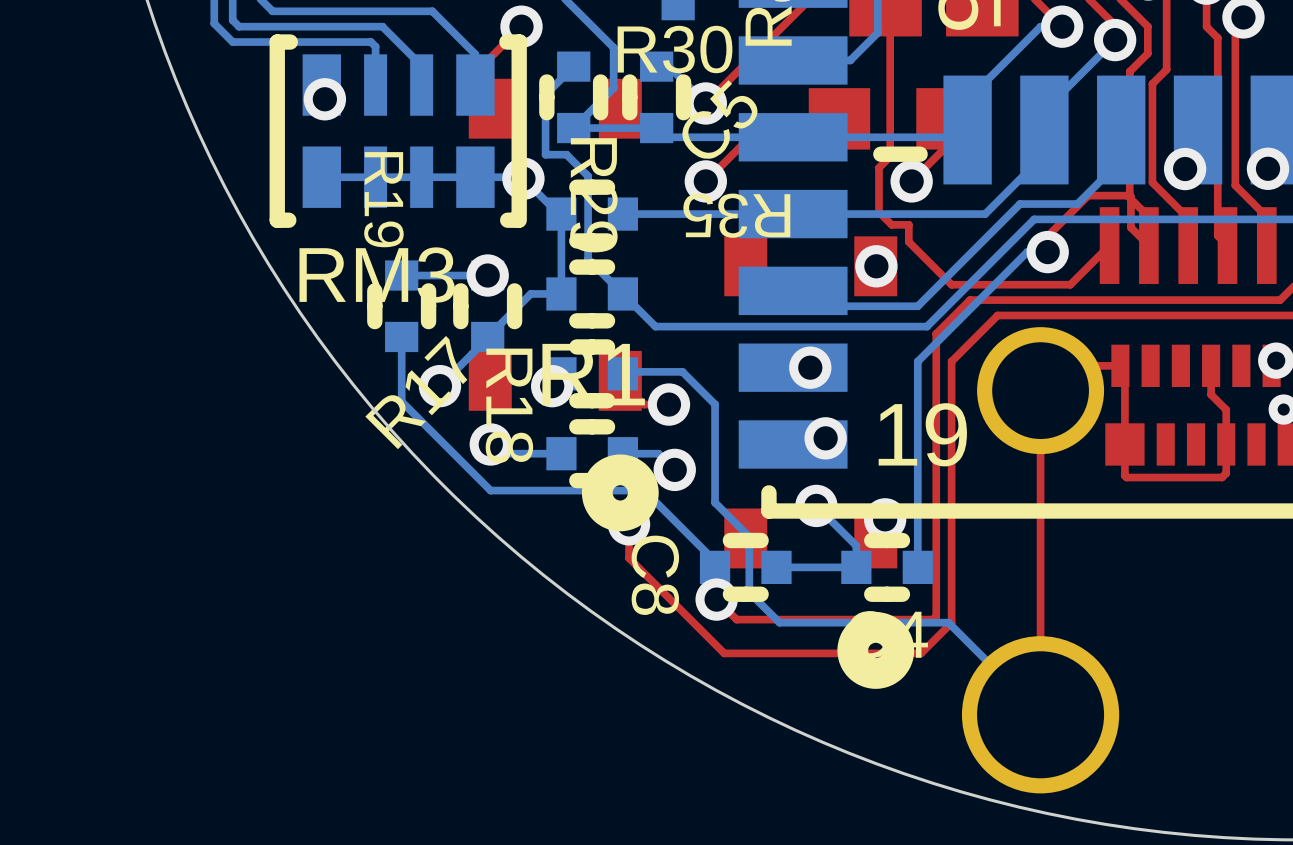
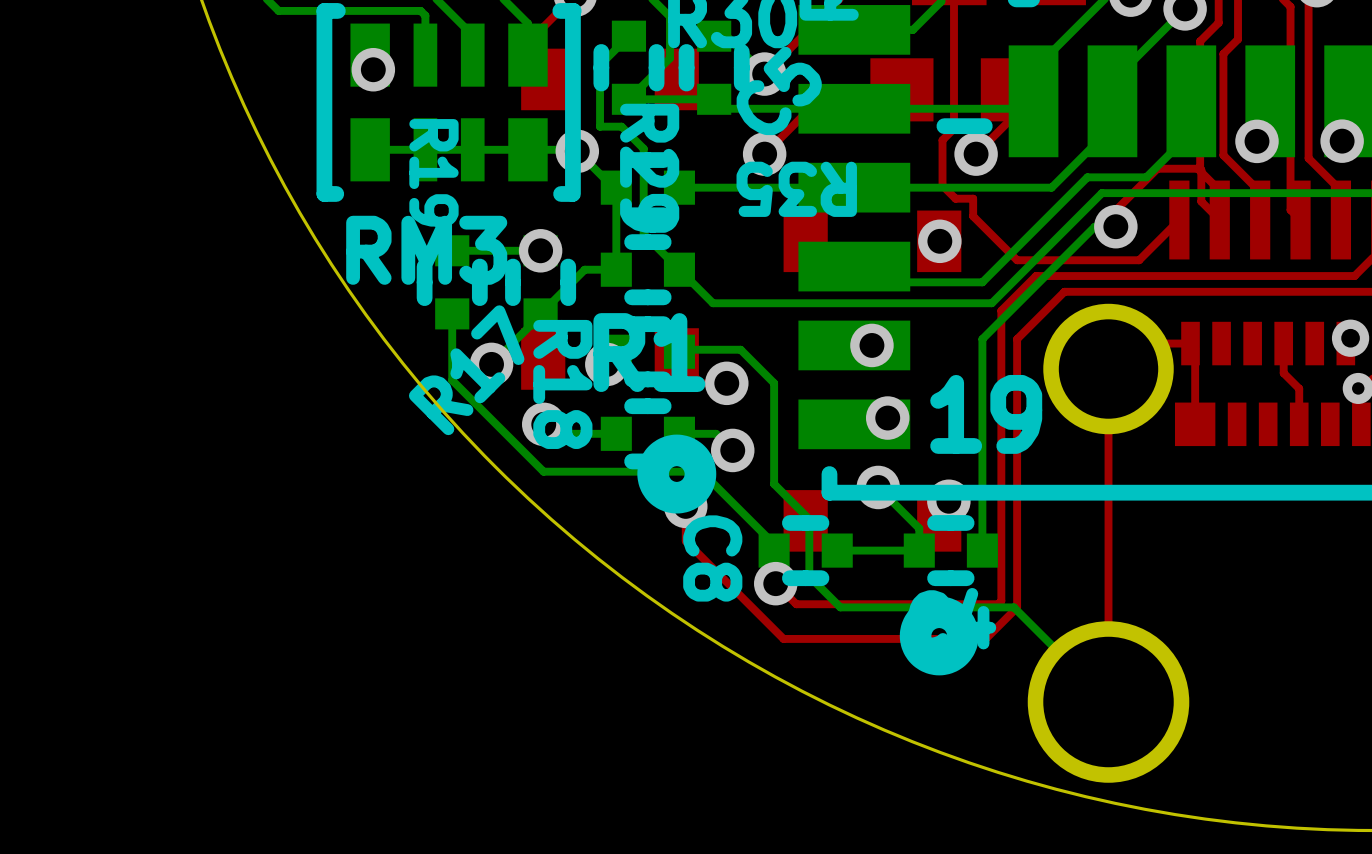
top track: (1226, 444) (1226, 473) (1222, 477) (1126, 477) (1124, 475) (1124, 444) -> none

